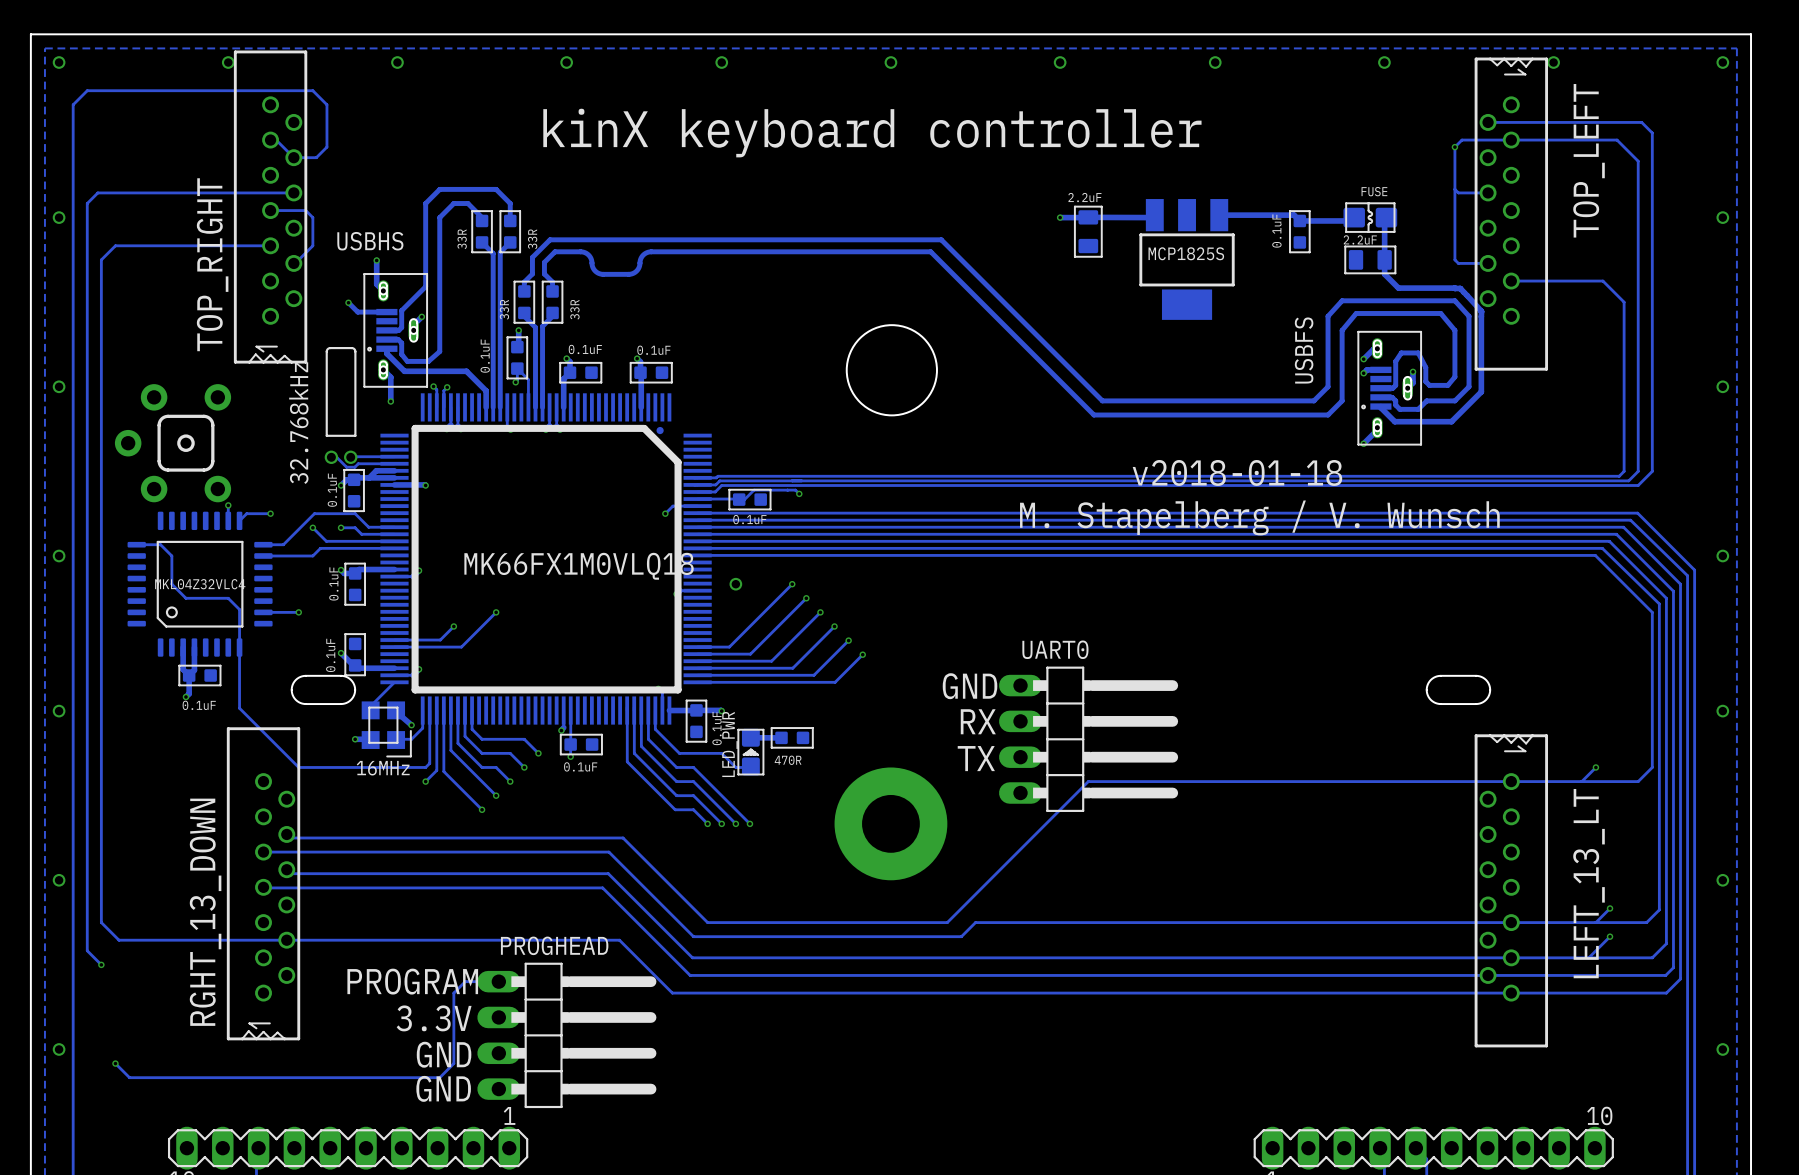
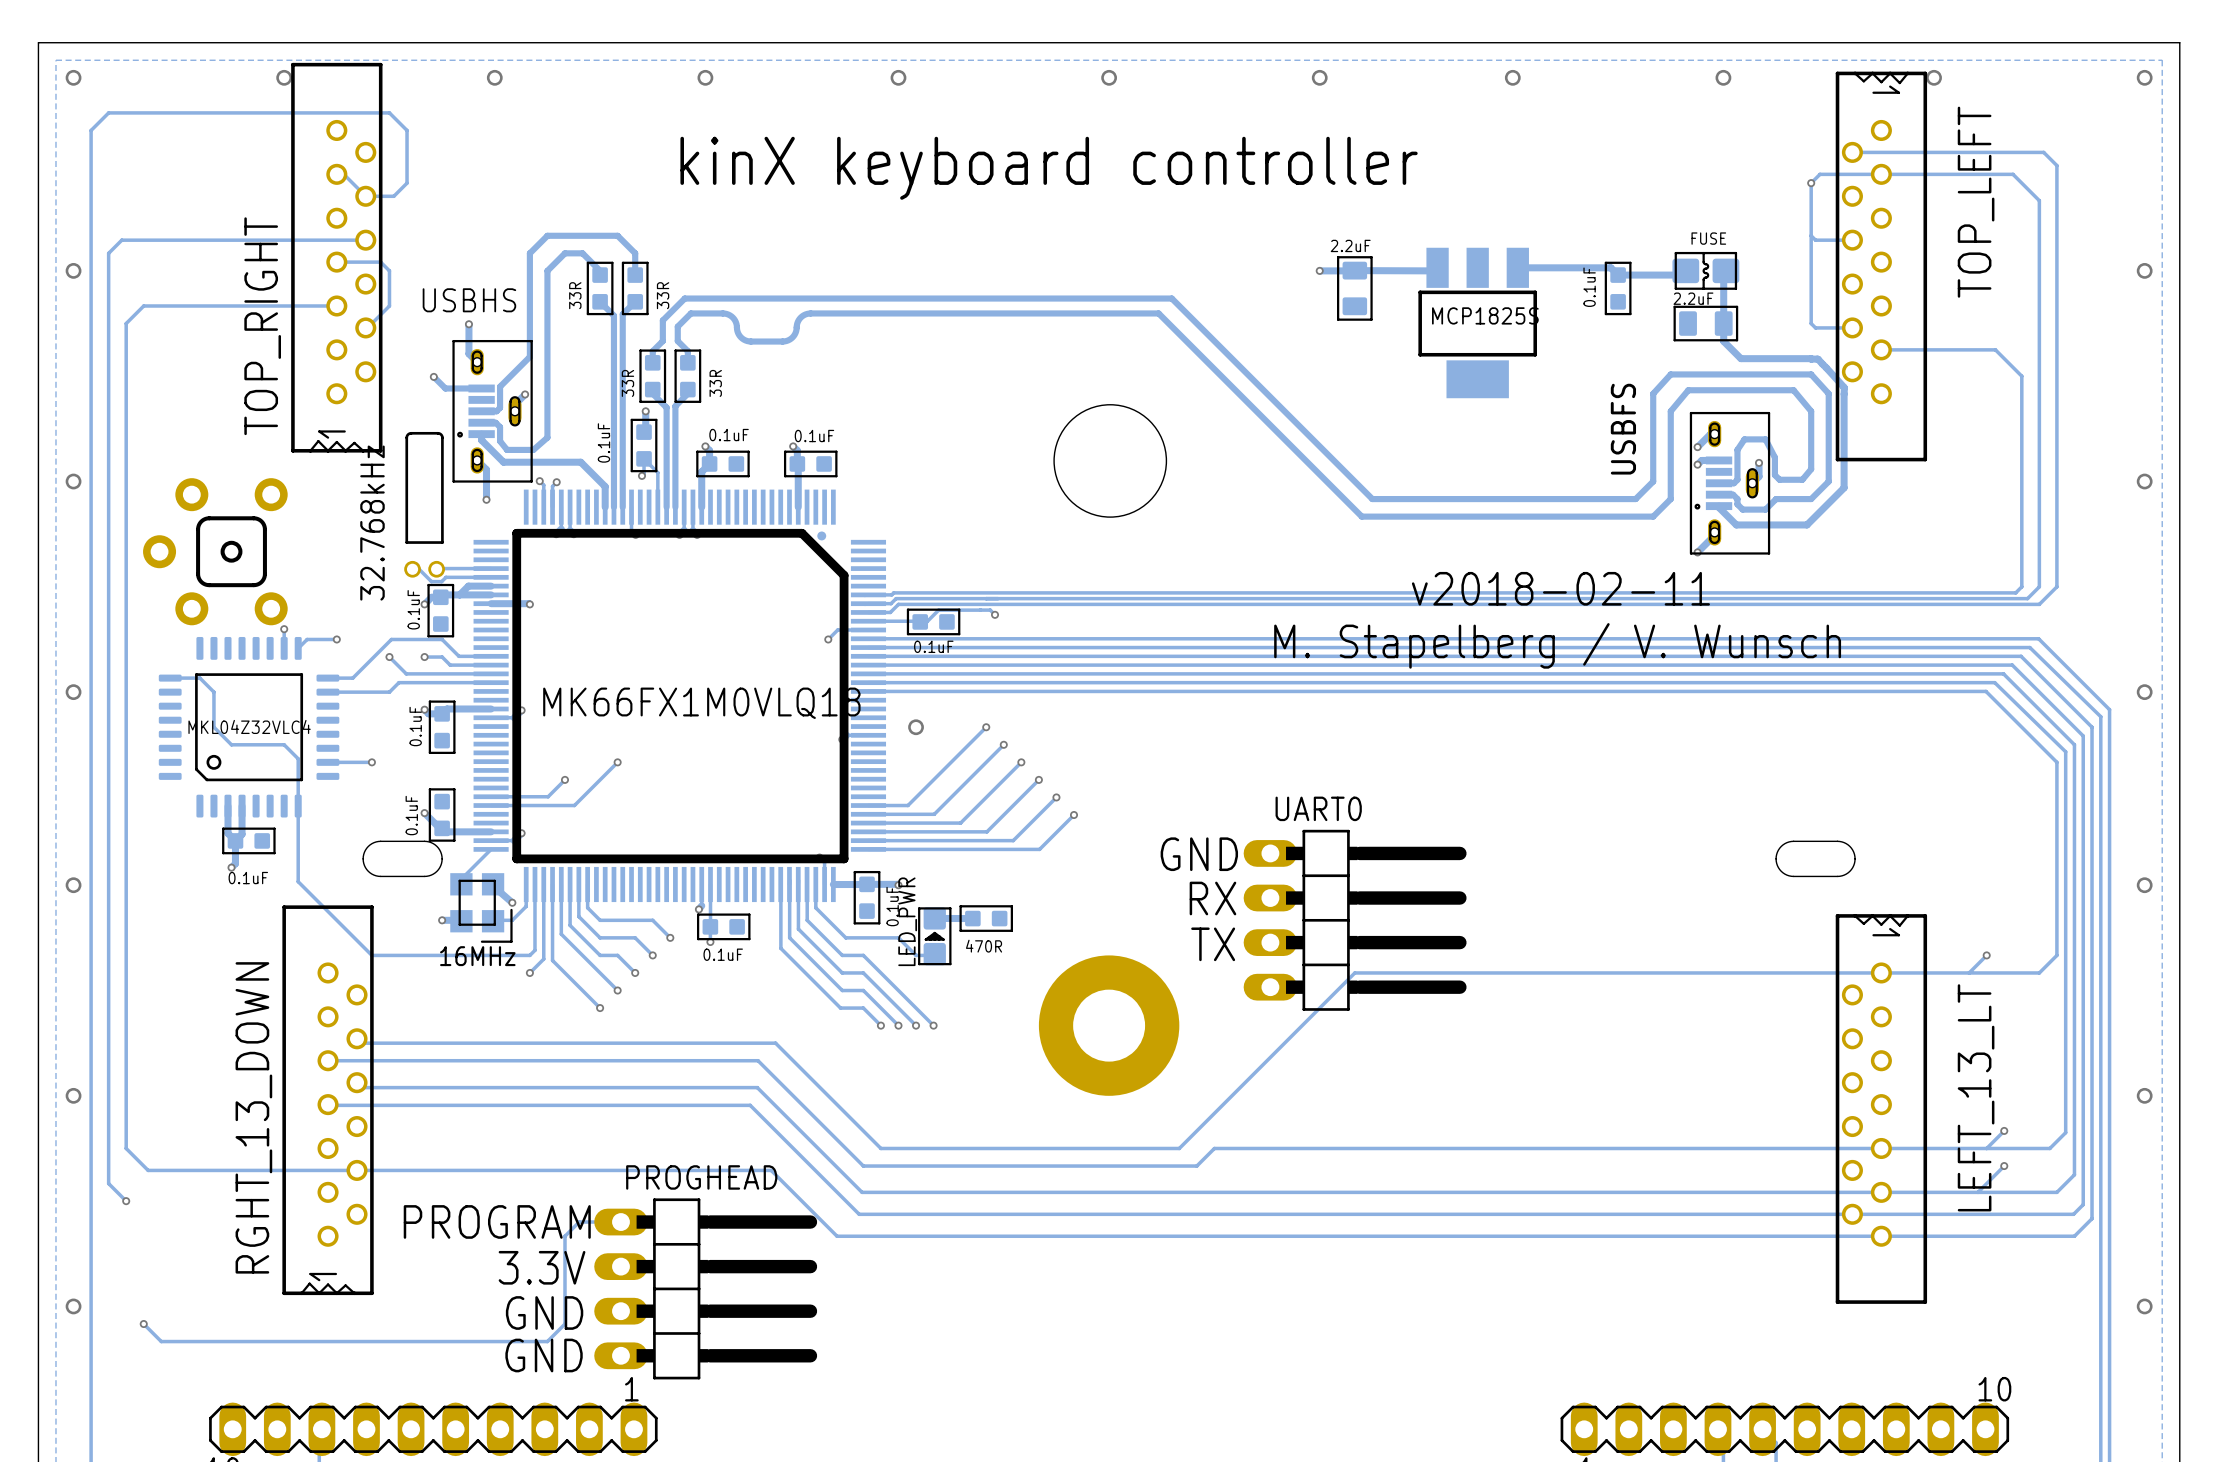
text: v2018-01-18 (1237, 472) -> v2018-02-11 (1560, 588)

